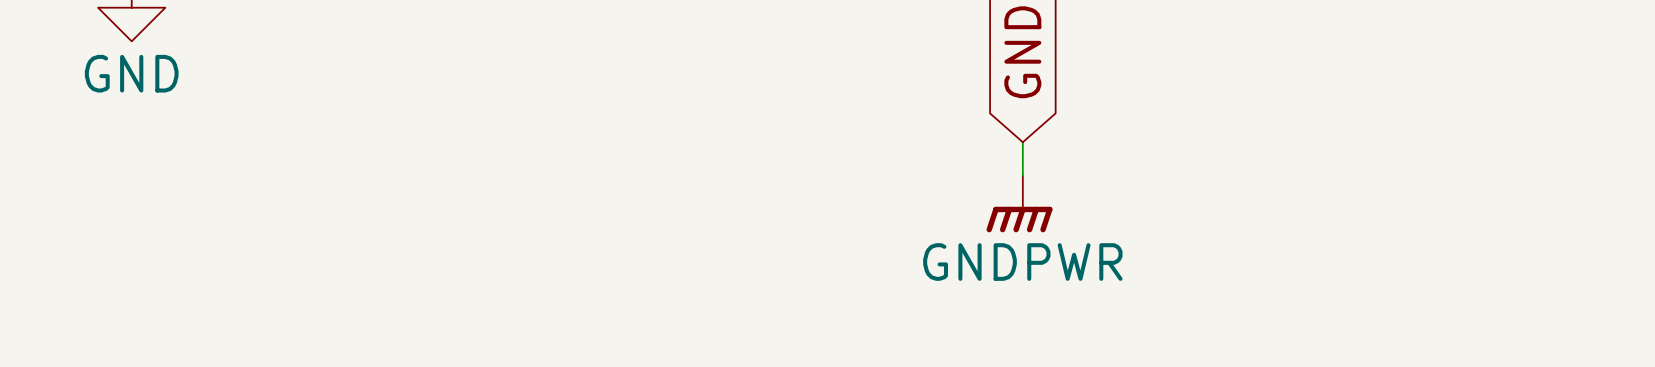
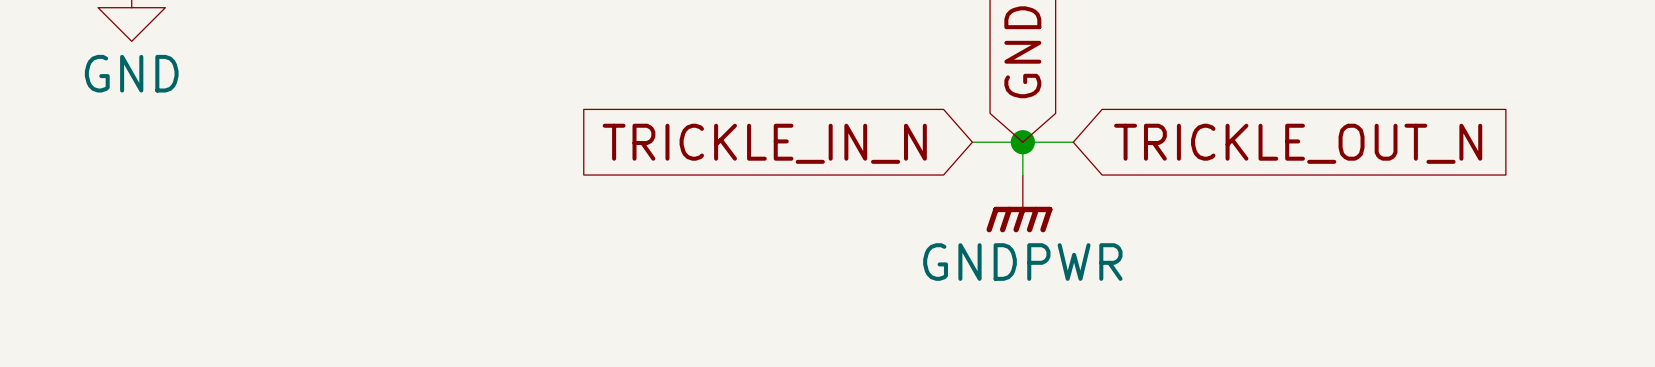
wire: none -> (972, 142) (1073, 142)
junction: none -> (1022, 142)
global label: none -> TRICKLE_IN_N (764, 143)
global label: none -> TRICKLE_OUT_N (1298, 143)

